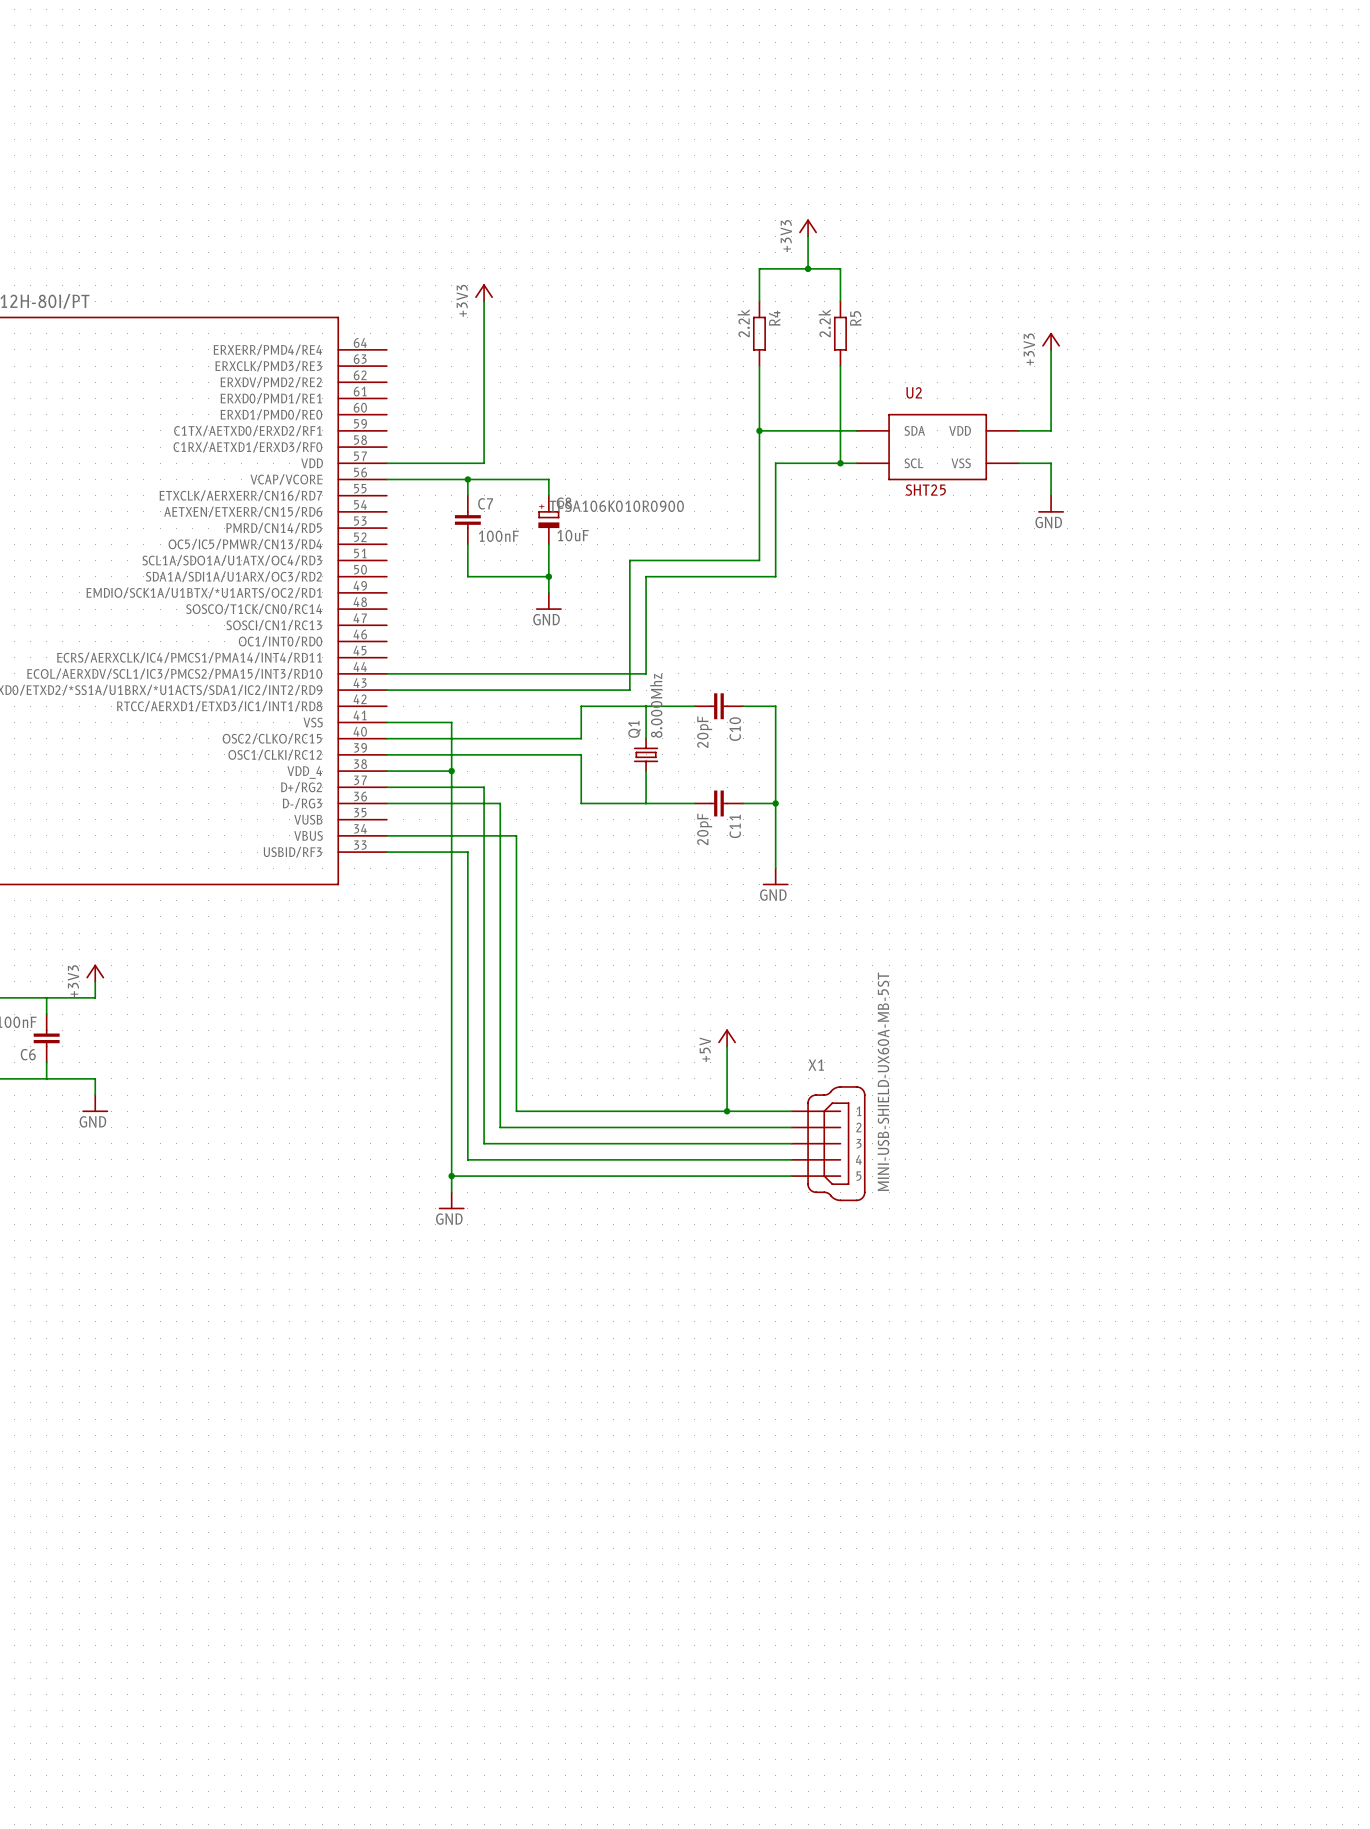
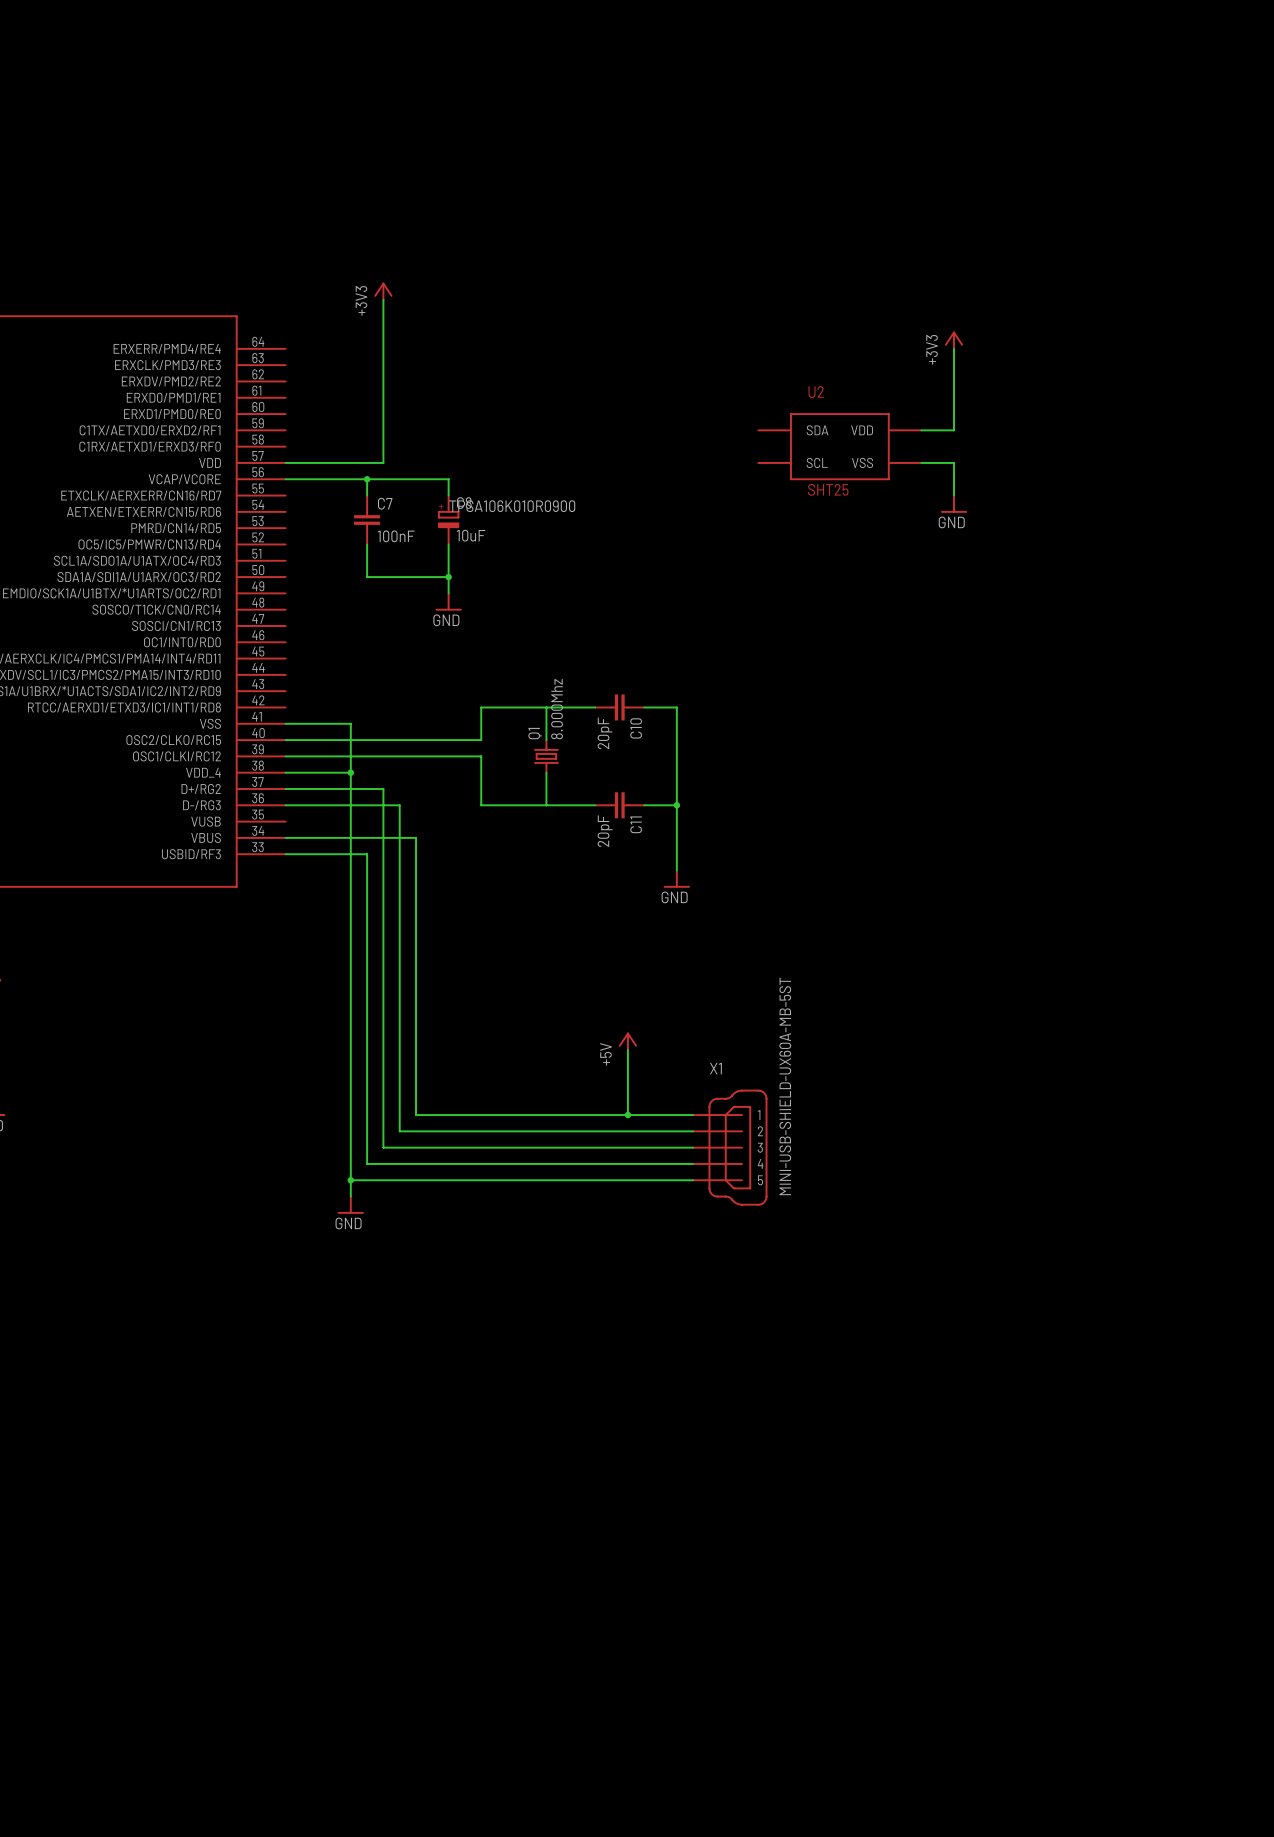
power symbol: +3V3 (808, 227) -> none
wire: (808, 236) (808, 268) -> none
junction: (808, 268) -> none
wire: (759, 301) (759, 268) (840, 268) (840, 301) -> none
R4: 2.2k (759, 333) -> none
R5: 2.2k (840, 333) -> none
wire: (759, 366) (759, 560) (629, 560) (629, 690) (386, 690) -> none
wire: (840, 366) (840, 463) -> none
wire: (759, 430) (856, 430) -> none
junction: (759, 430) -> none
junction: (840, 463) -> none
wire: (856, 463) (775, 463) (775, 576) (646, 576) (646, 673) (386, 673) -> none

